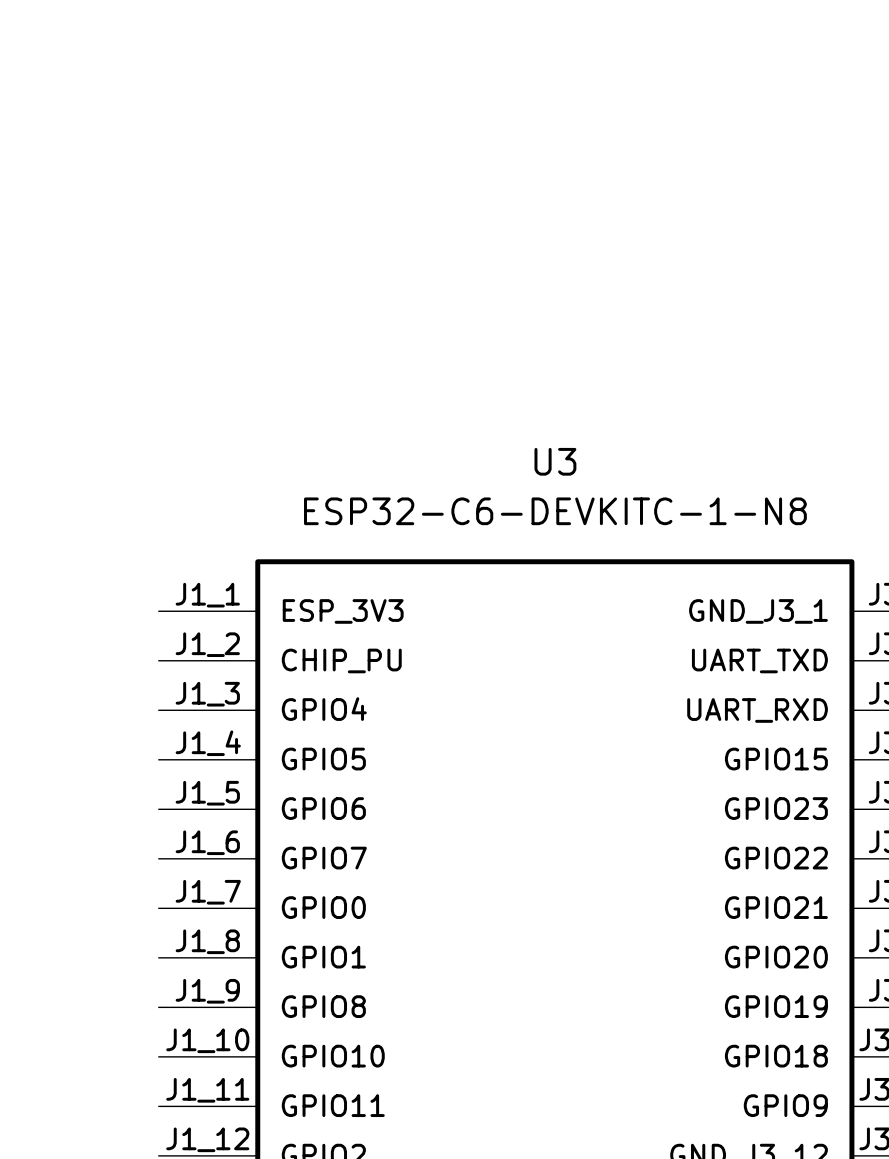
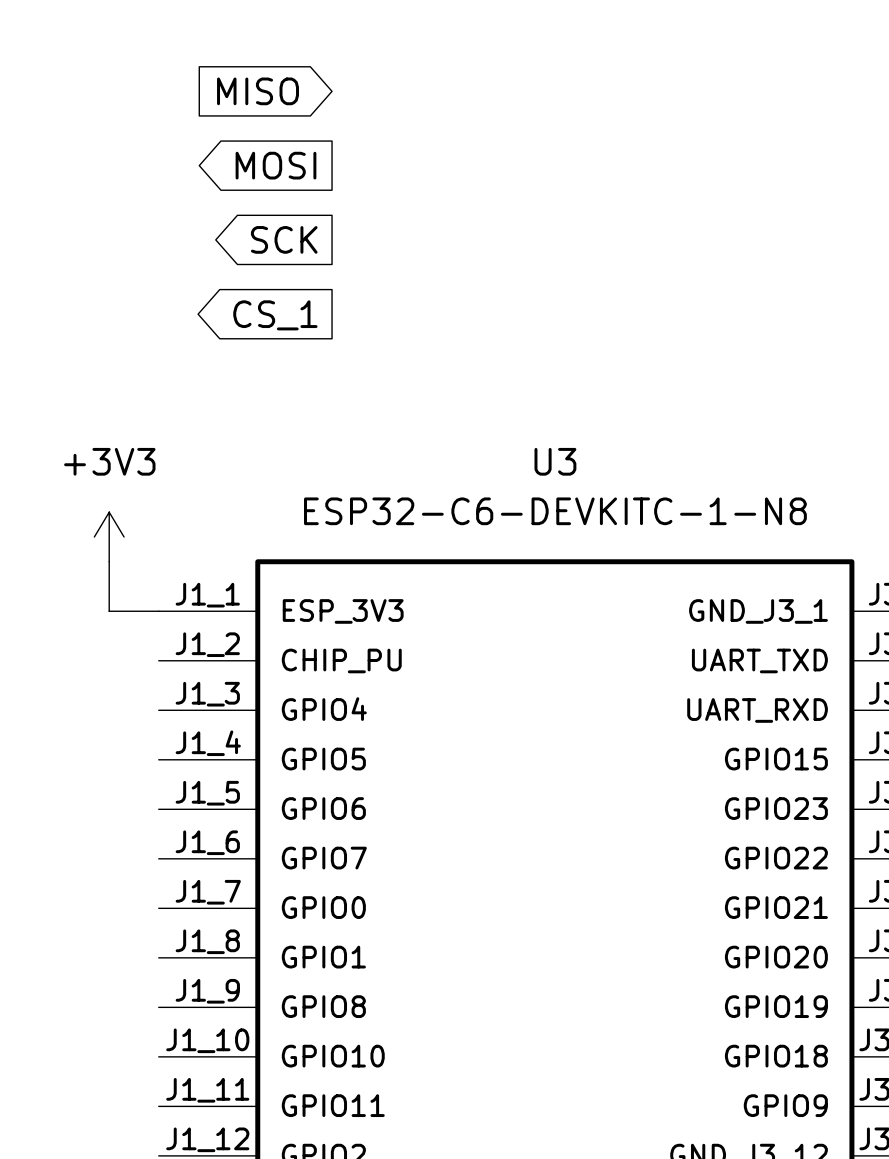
global label: none -> MISO (258, 91)
global label: none -> MOSI (275, 165)
global label: none -> SCK (284, 239)
global label: none -> CS_1 (275, 315)
power symbol: none -> +3V3 (109, 536)
wire: none -> (109, 561) (109, 611) (158, 611)

